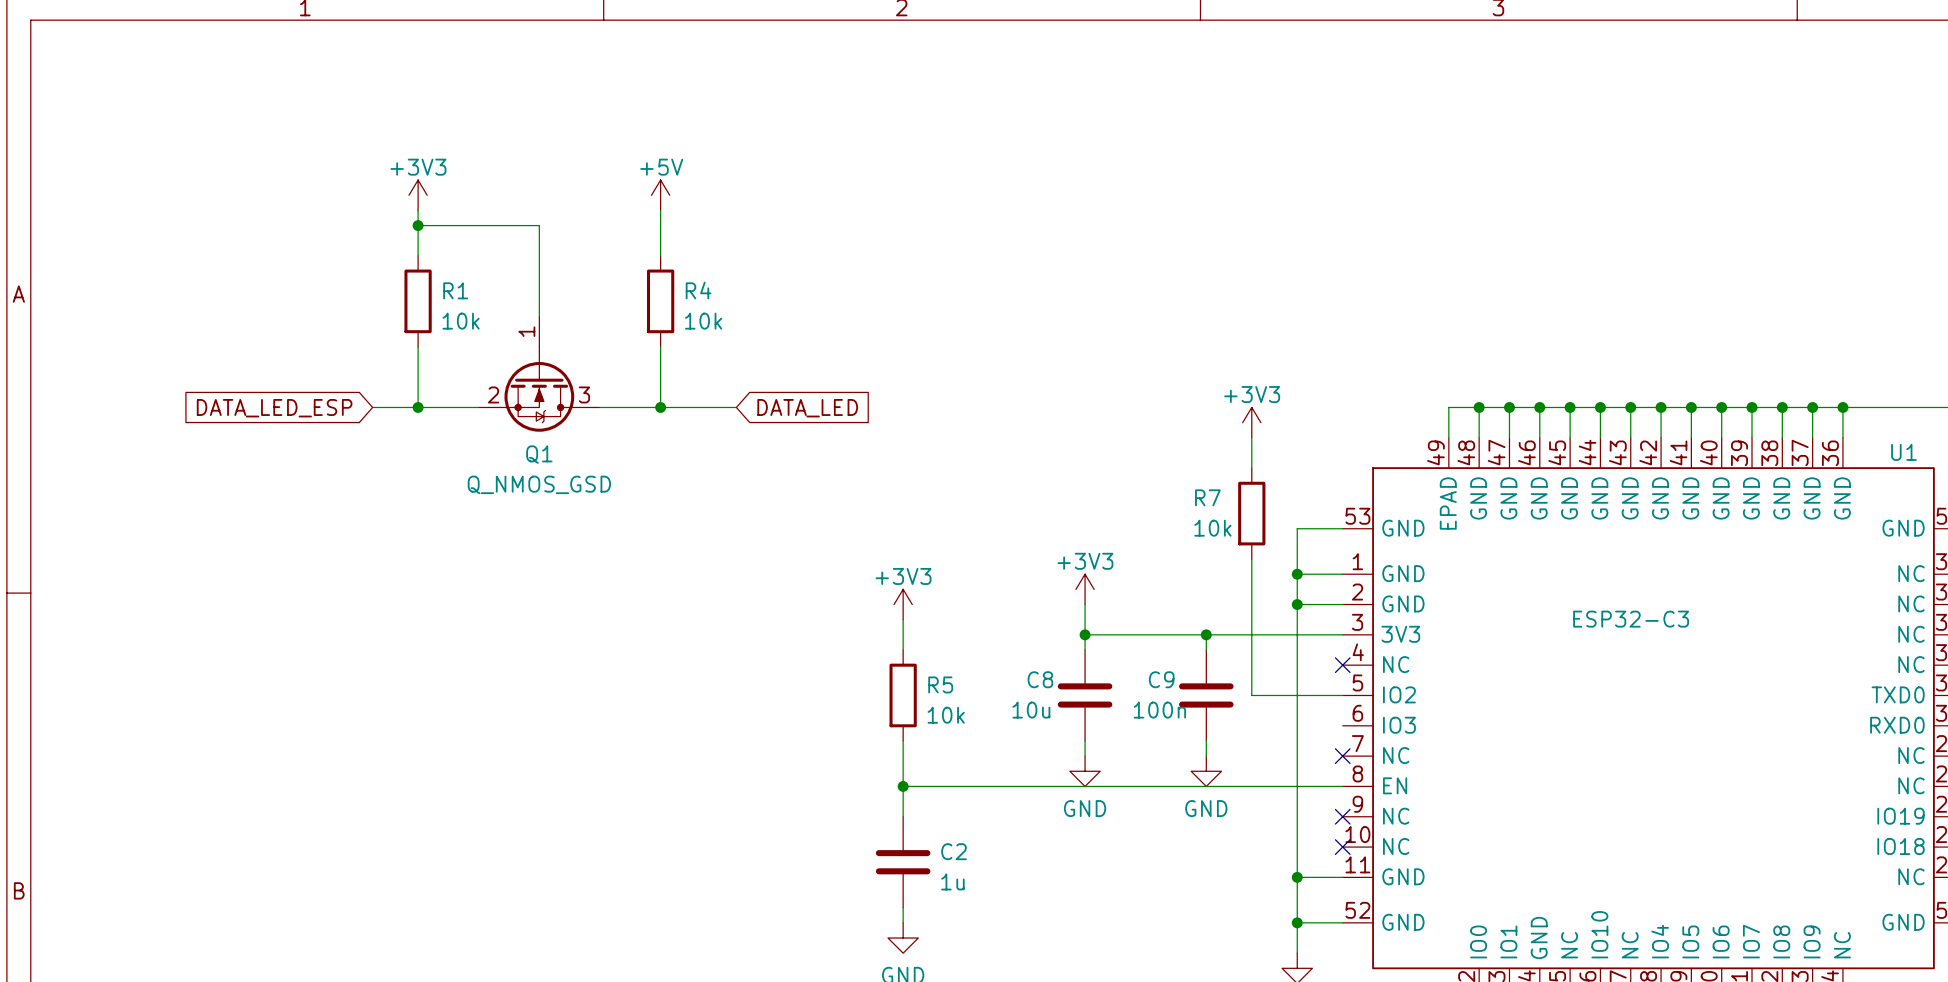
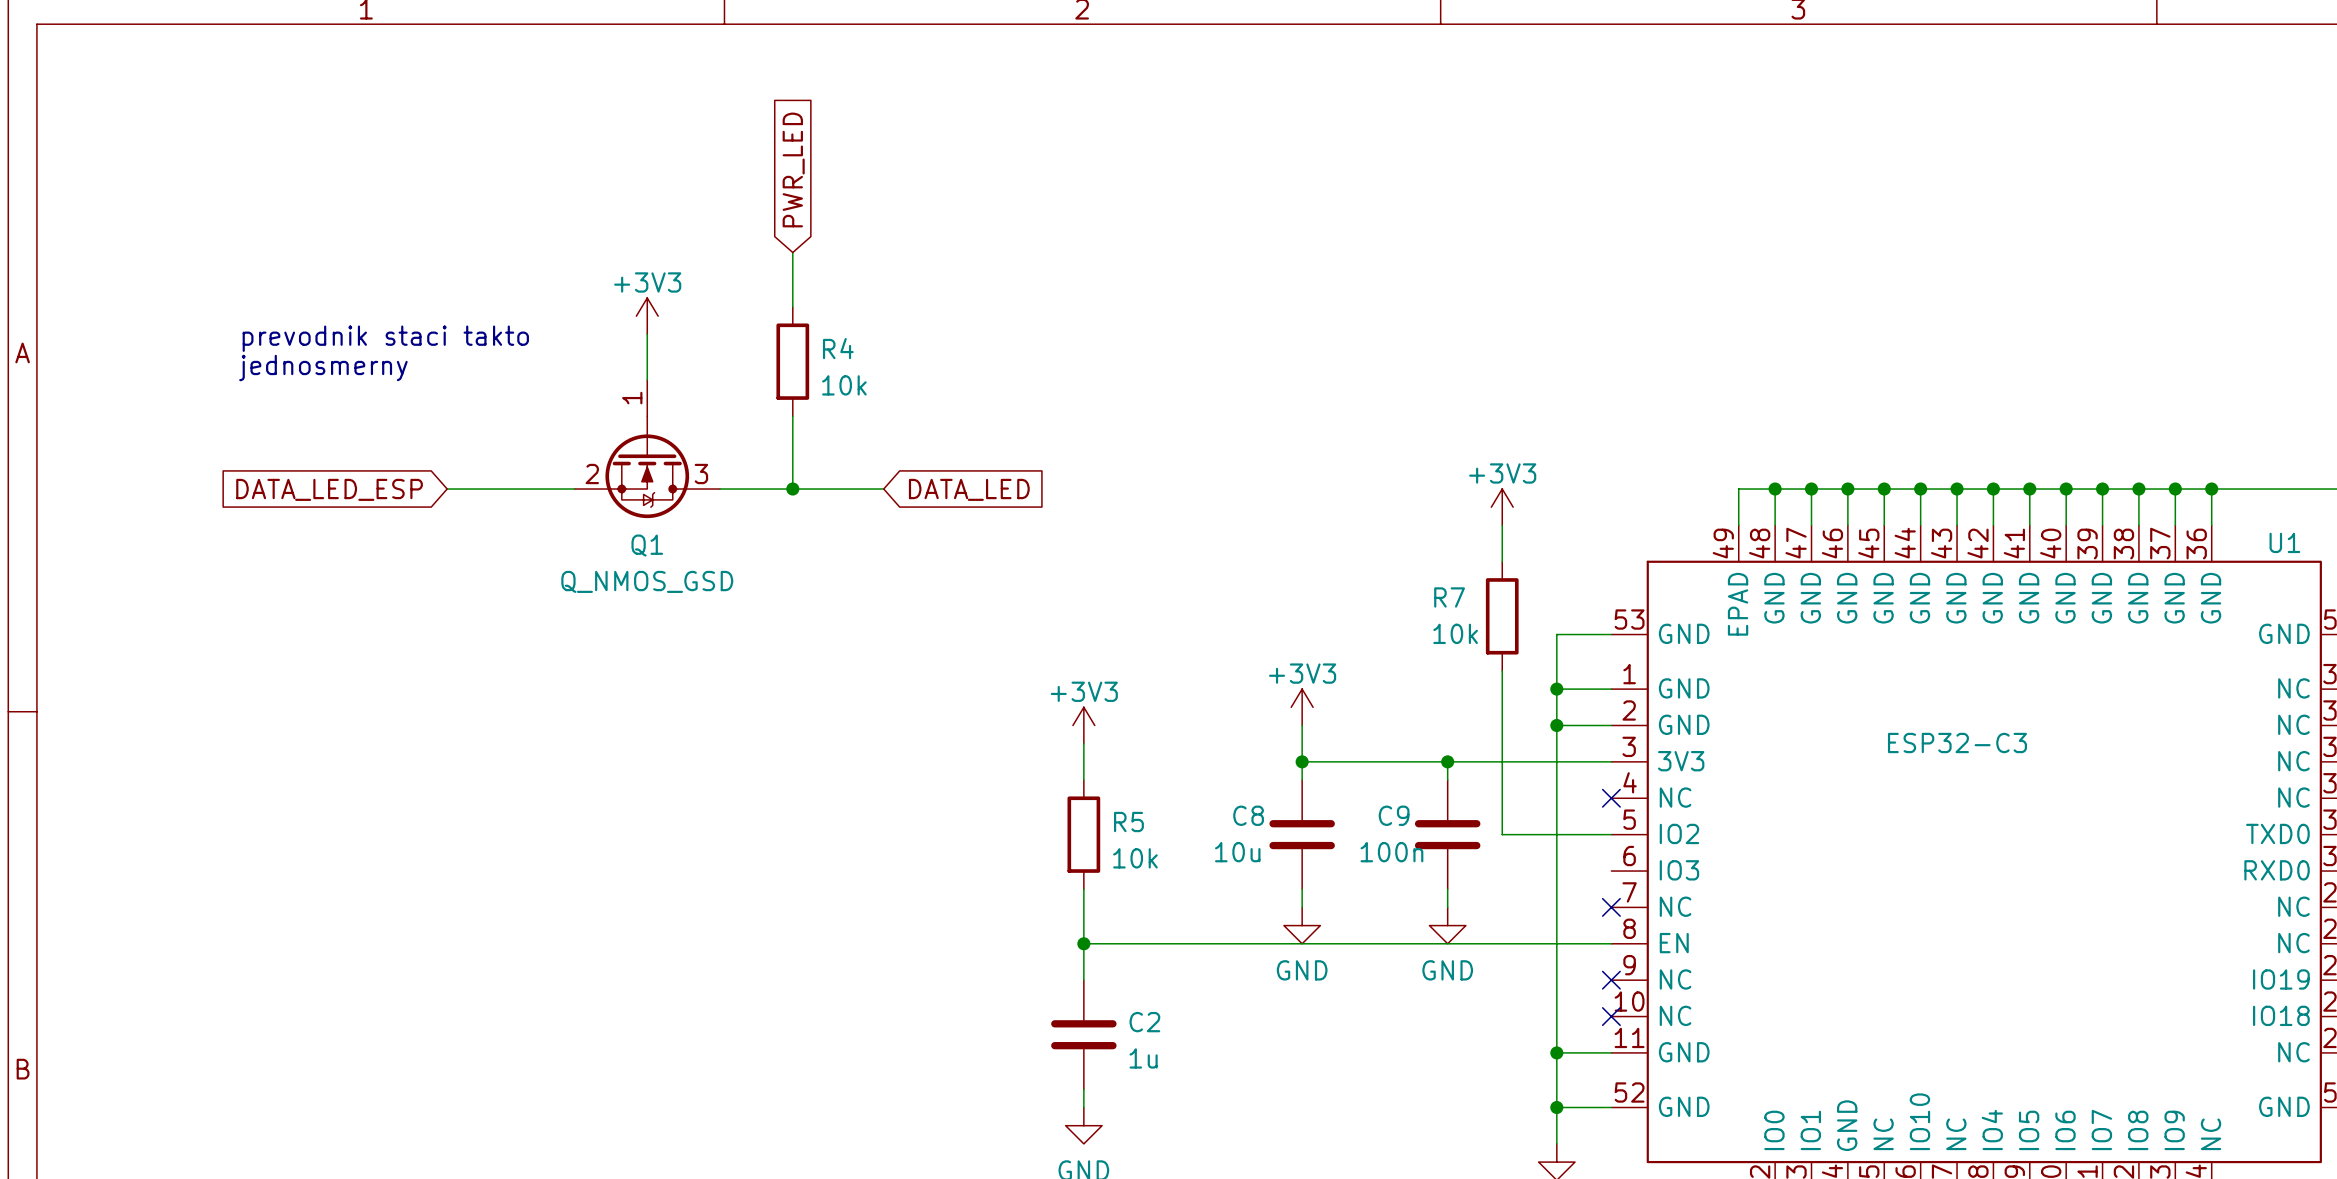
global label: none -> PWR_LED (793, 169)
power symbol position: +3V3 (418, 195) -> +3V3 (647, 316)
power symbol: +5V (660, 195) -> none
wire: (418, 210) (418, 255) -> none
wire: (418, 225) (539, 225) (539, 278) -> none
junction: (418, 225) -> none
text: none -> prevodnik staci takto (385, 338)
R1: 10k (418, 301) -> none
text: none -> jednosmerny (323, 367)
wire: (418, 346) (418, 407) -> none
junction: (418, 407) -> none

